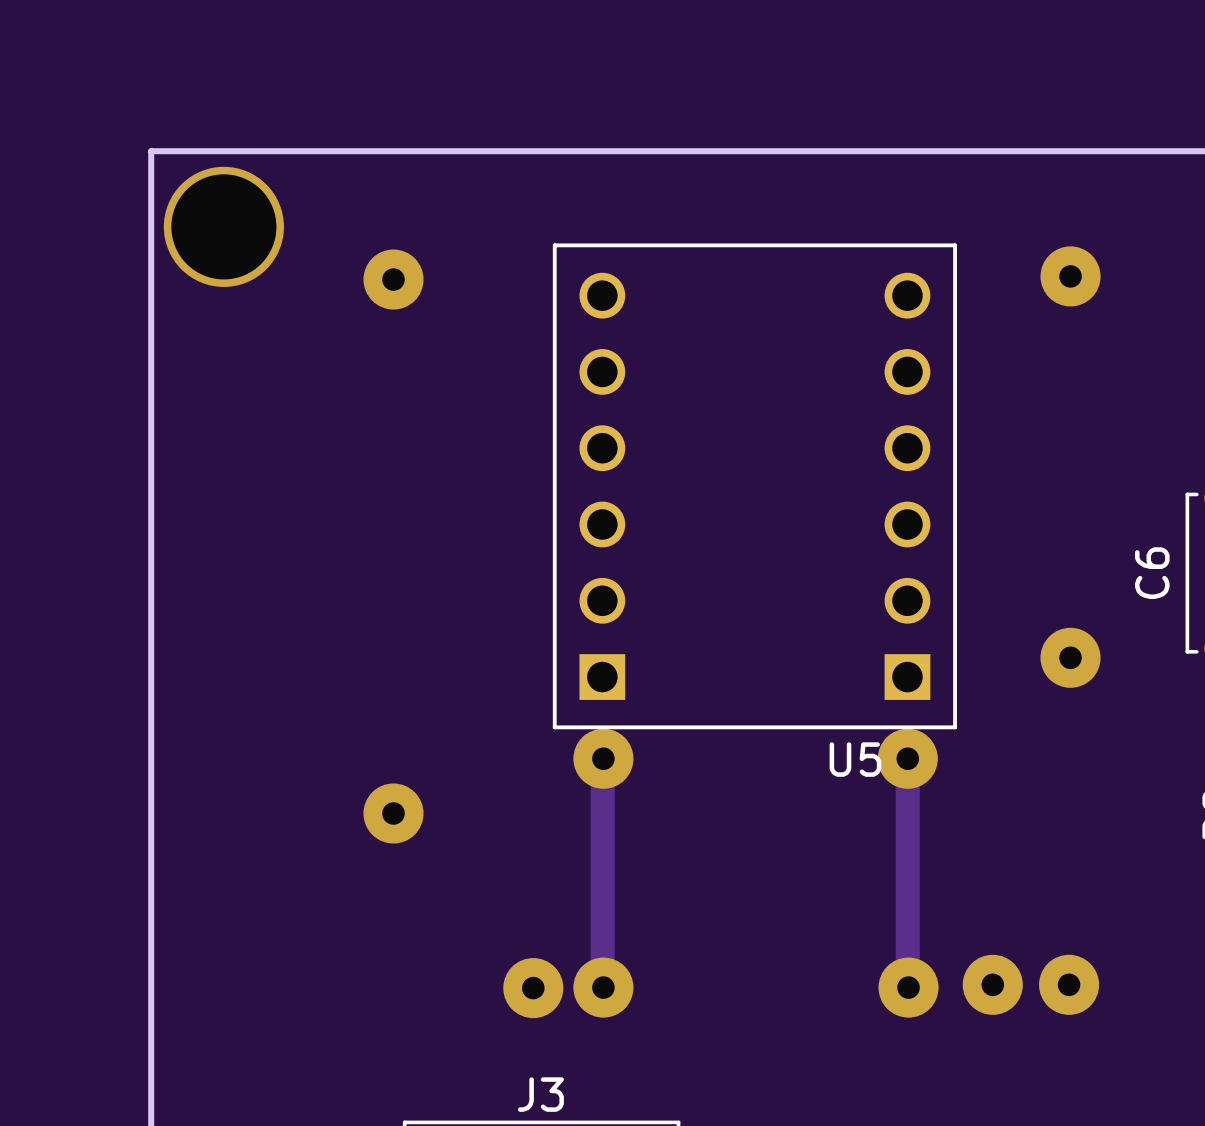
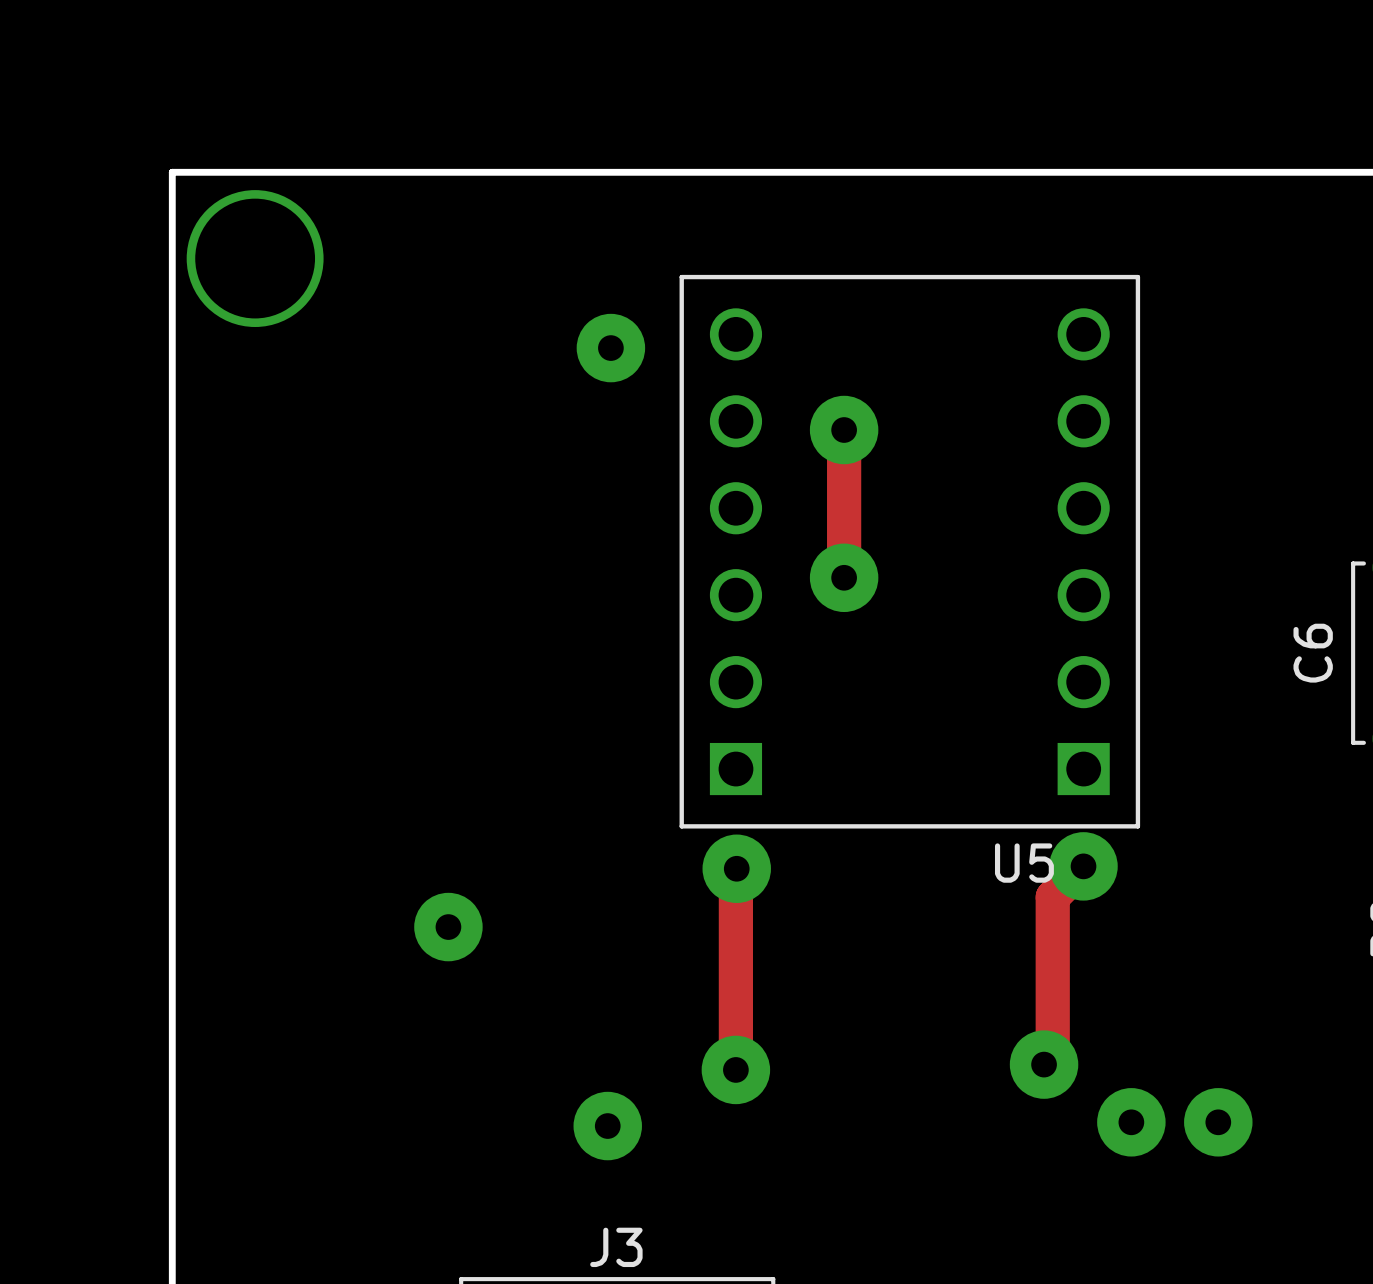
via: (1070, 276) -> none
via position: (393, 279) -> (610, 348)
track: none -> (844, 430) (844, 577)
via: none -> (844, 430)
U5 position: (754, 486) -> (909, 551)
via: none -> (844, 577)
via: (1070, 657) -> none
track: (603, 758) (603, 987) -> none
via position: (603, 758) -> (736, 868)
track: (907, 758) (908, 987) -> none
via position: (907, 758) -> (1083, 866)
track: none -> (1083, 866) (1052, 897) (1052, 1055) (1044, 1064)
track: none -> (736, 868) (735, 1069)
via position: (603, 987) -> (735, 1069)
via position: (908, 987) -> (1044, 1064)

